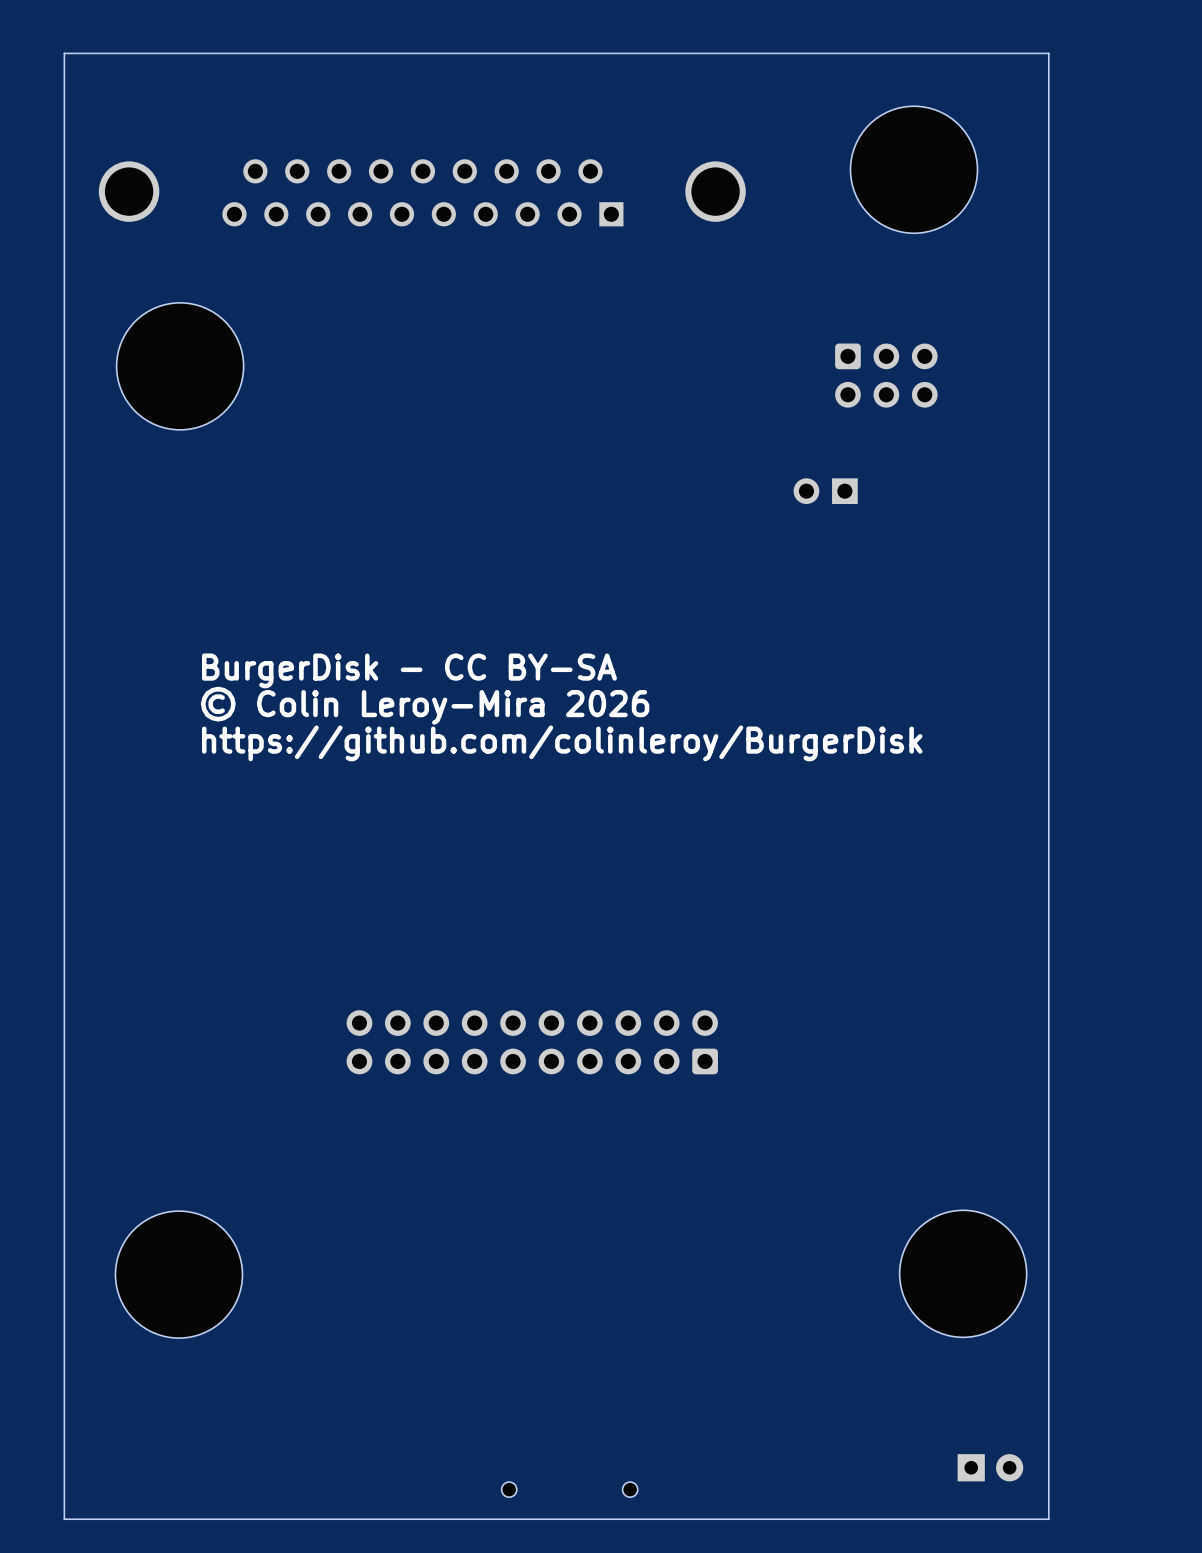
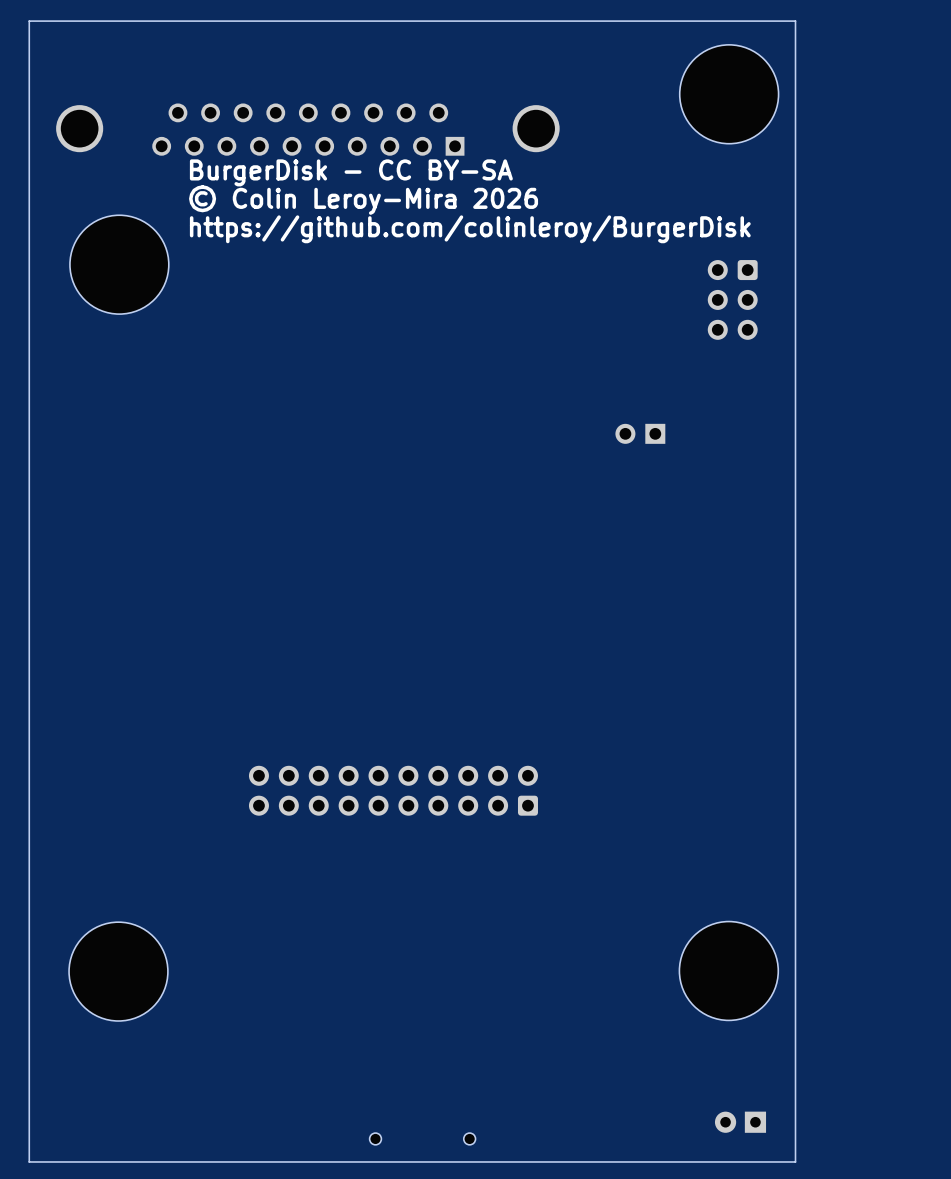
part position: (914, 169) -> (729, 94)
text: none -> BurgerDisk - CC BY-SA (351, 172)
text: none -> © Colin Leroy-Mira 2026 (363, 200)
text: none -> https://github.com/colinleroy/BurgerDisk (470, 229)
part rotation: 0° (886, 375) -> 90° clockwise (732, 299)
part position: (886, 375) -> (732, 299)
part position: (825, 491) -> (640, 433)
text: BurgerDisk - CC BY-SA (409, 670) -> none
text: © Colin Leroy-Mira 2026 (425, 705) -> none
text: https://github.com/colinleroy/BurgerDisk (562, 743) -> none
part rotation: 0° (990, 1467) -> 180° (740, 1122)

